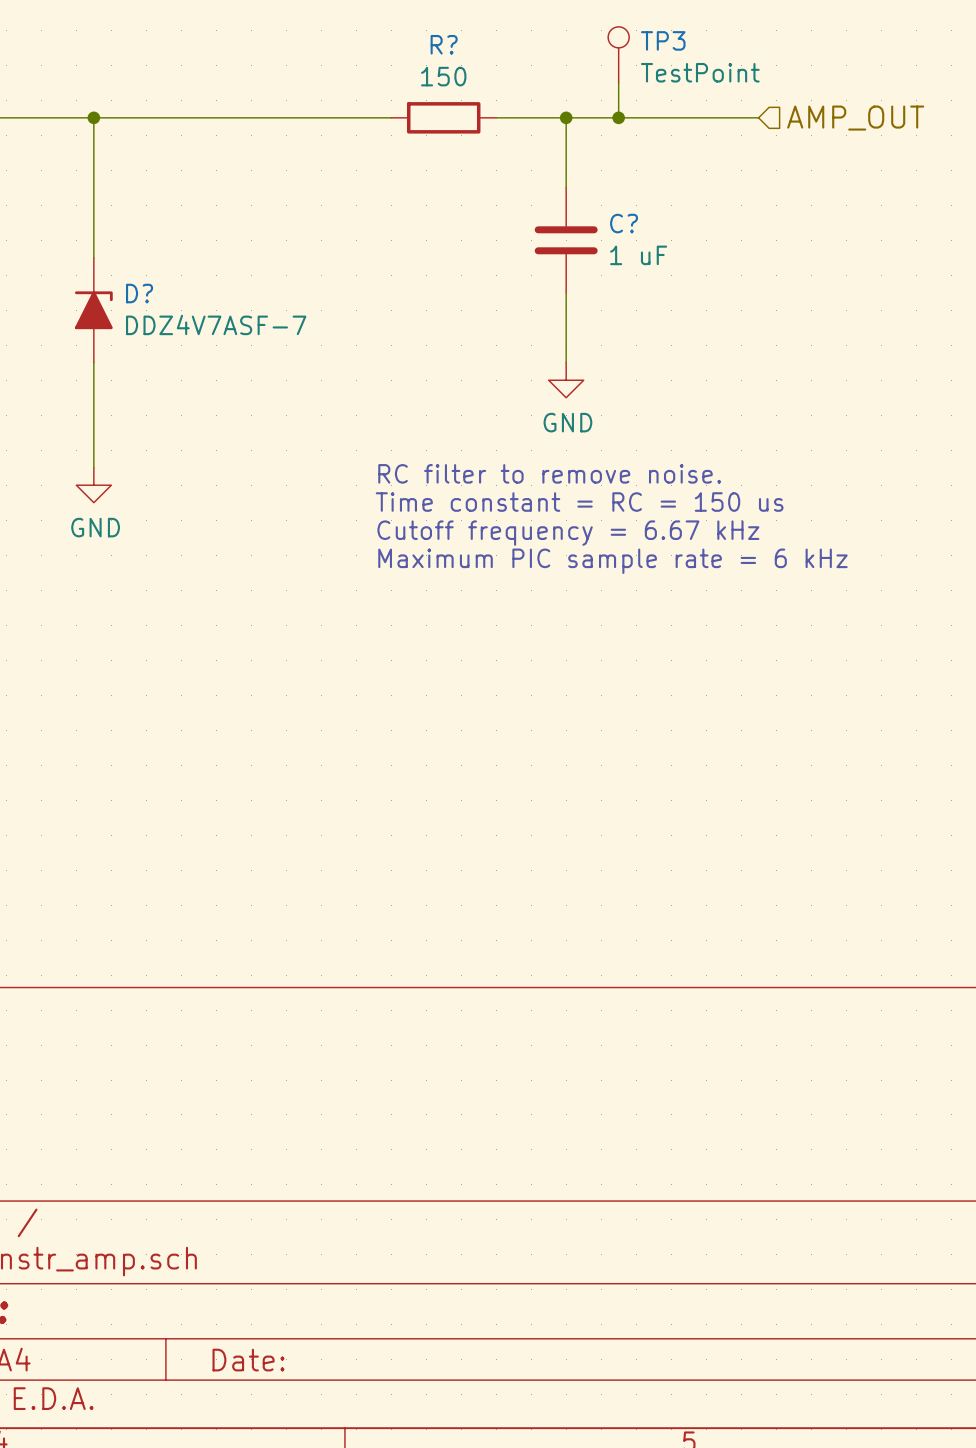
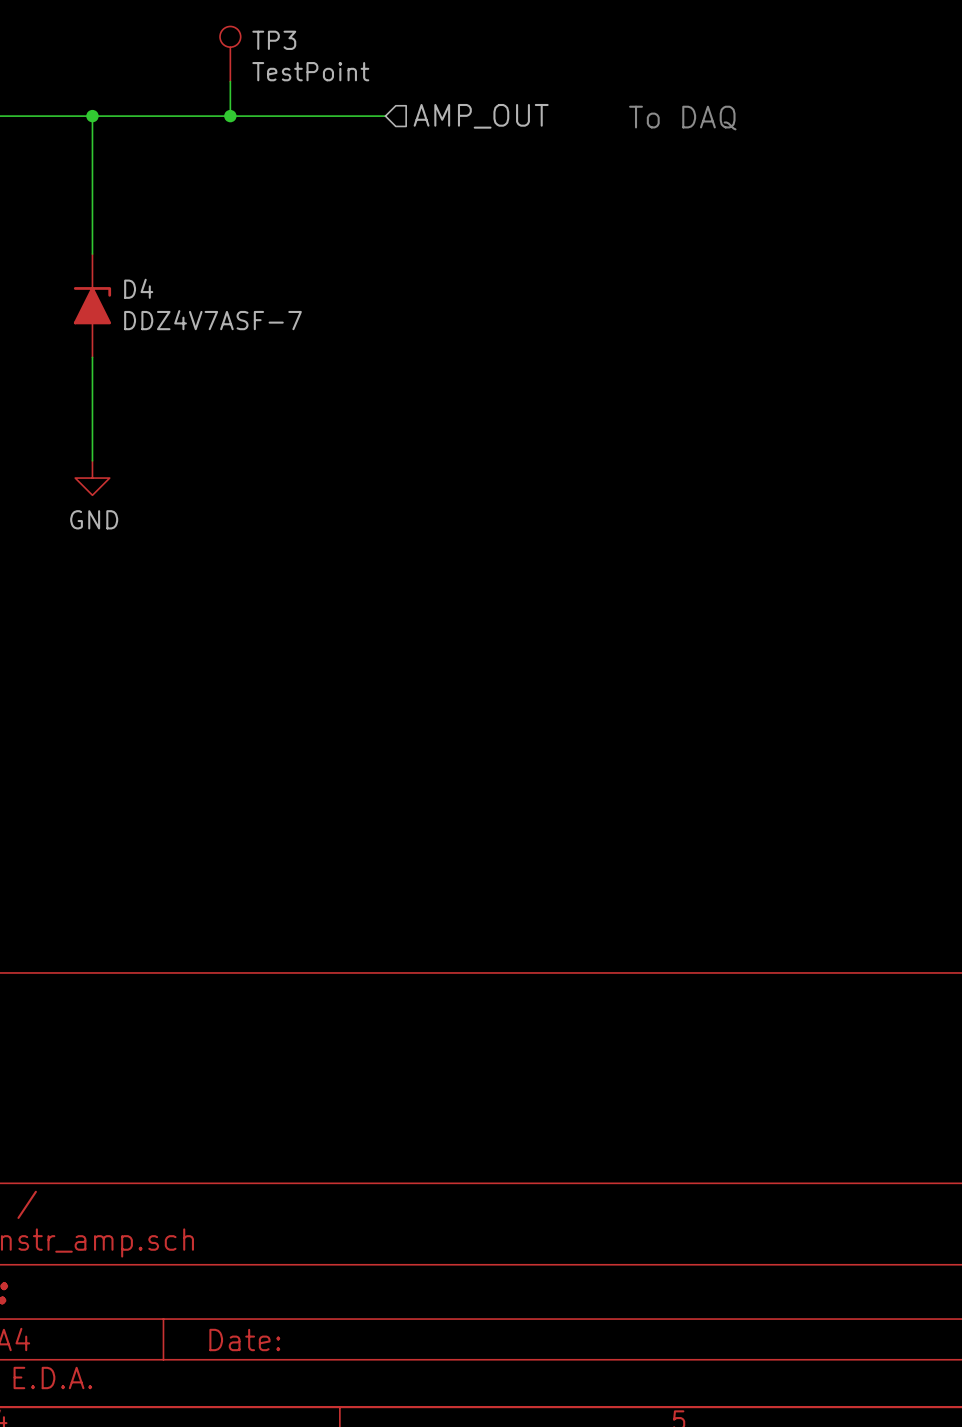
TP3 position: (618, 54) -> (230, 54)
wire: none -> (230, 81) (230, 116)
wire: (618, 82) (618, 117) -> none
junction: none -> (230, 116)
R?: 150 (443, 117) -> none
wire: (496, 117) (758, 117) -> none
wire: (566, 117) (566, 187) -> none
junction: (566, 117) -> none
junction: (618, 117) -> none
hierarchical label: none -> AMP_OUT (481, 116)
hierarchical label: AMP_OUT (855, 118) -> none
text: none -> To DAQ (682, 118)
C?: 1 uF (566, 240) -> none
wire: (566, 292) (566, 362) -> none
D? name: D? (139, 293) -> D4 (138, 288)
power symbol: GND (566, 380) -> none
text: RC filter to remove noise. (549, 473) -> none
text: Time constant = RC = 150 us (579, 502) -> none
text: Cutoff frequency = 6.67 kHz (568, 533) -> none
text: Maximum PIC sample rate = 6 kHz (612, 561) -> none

